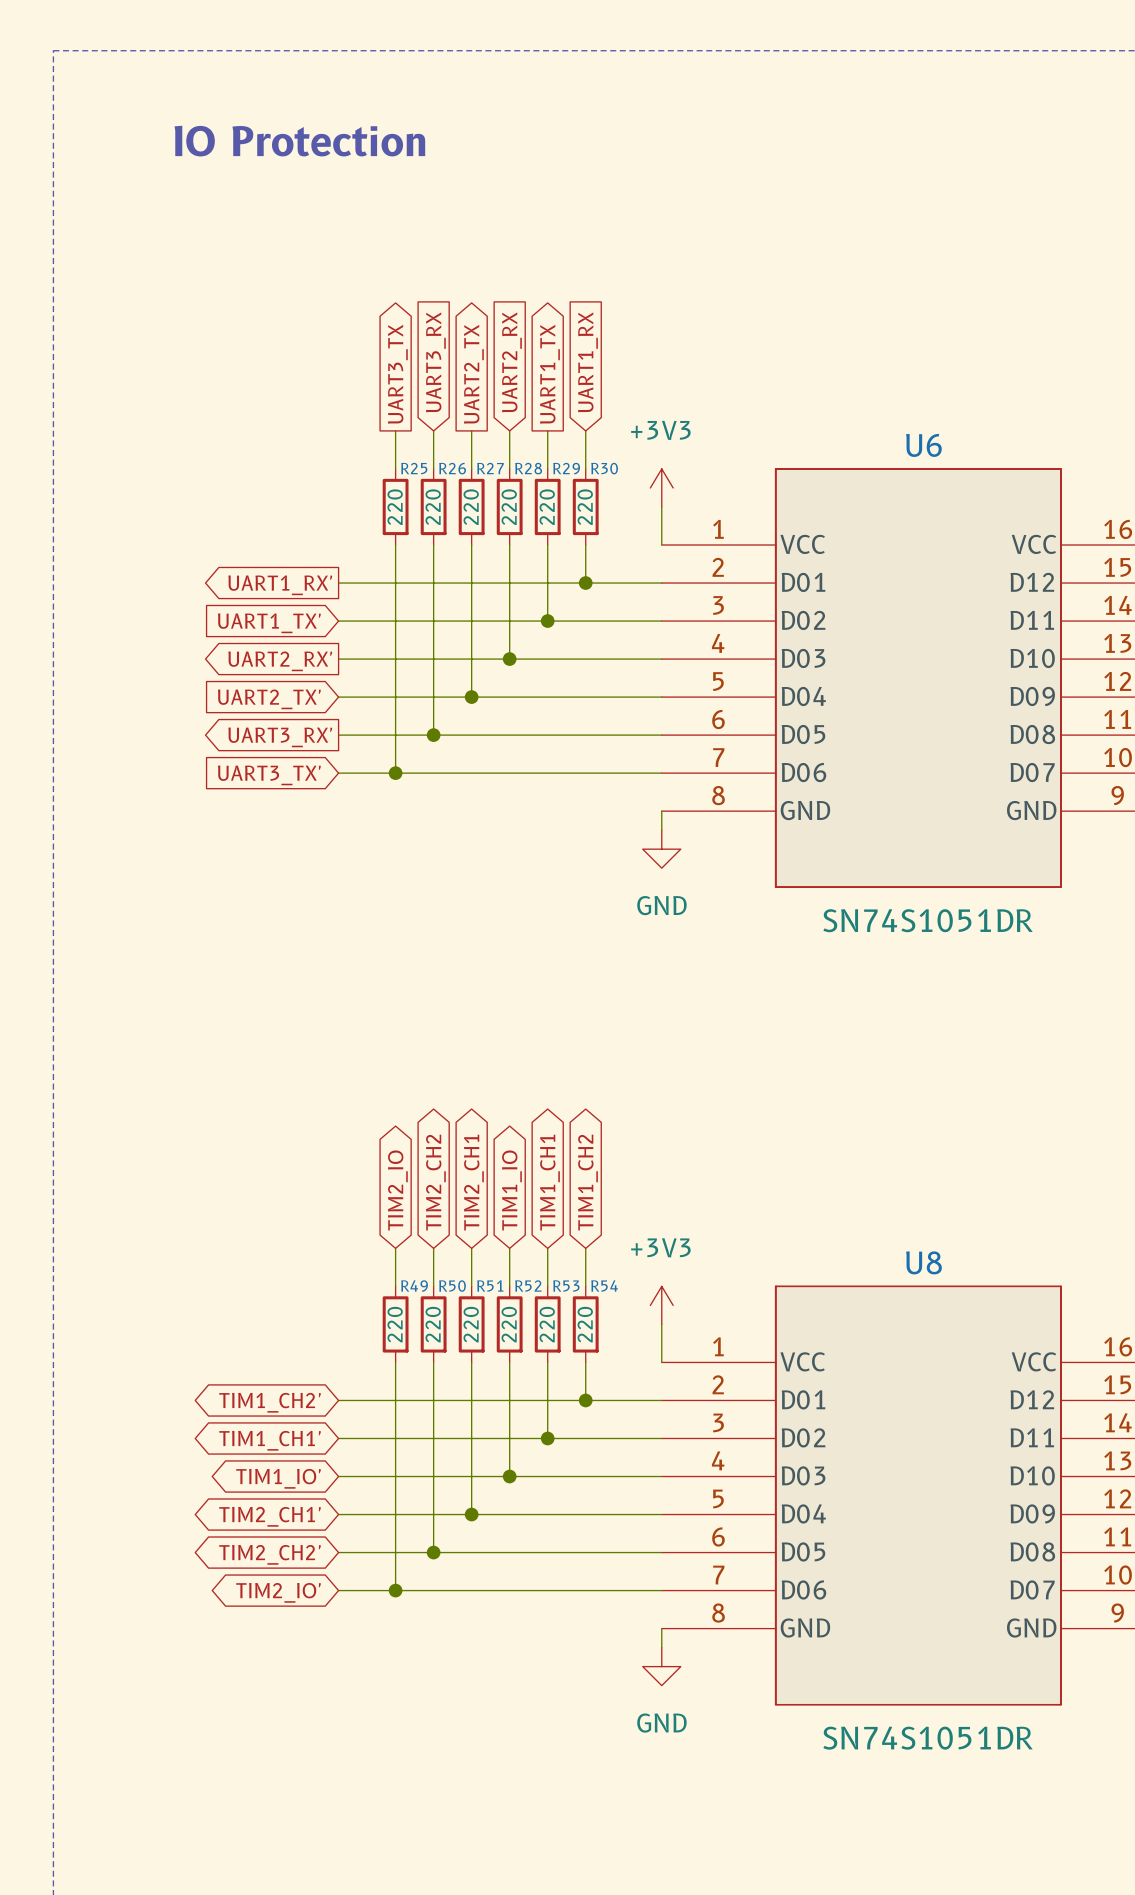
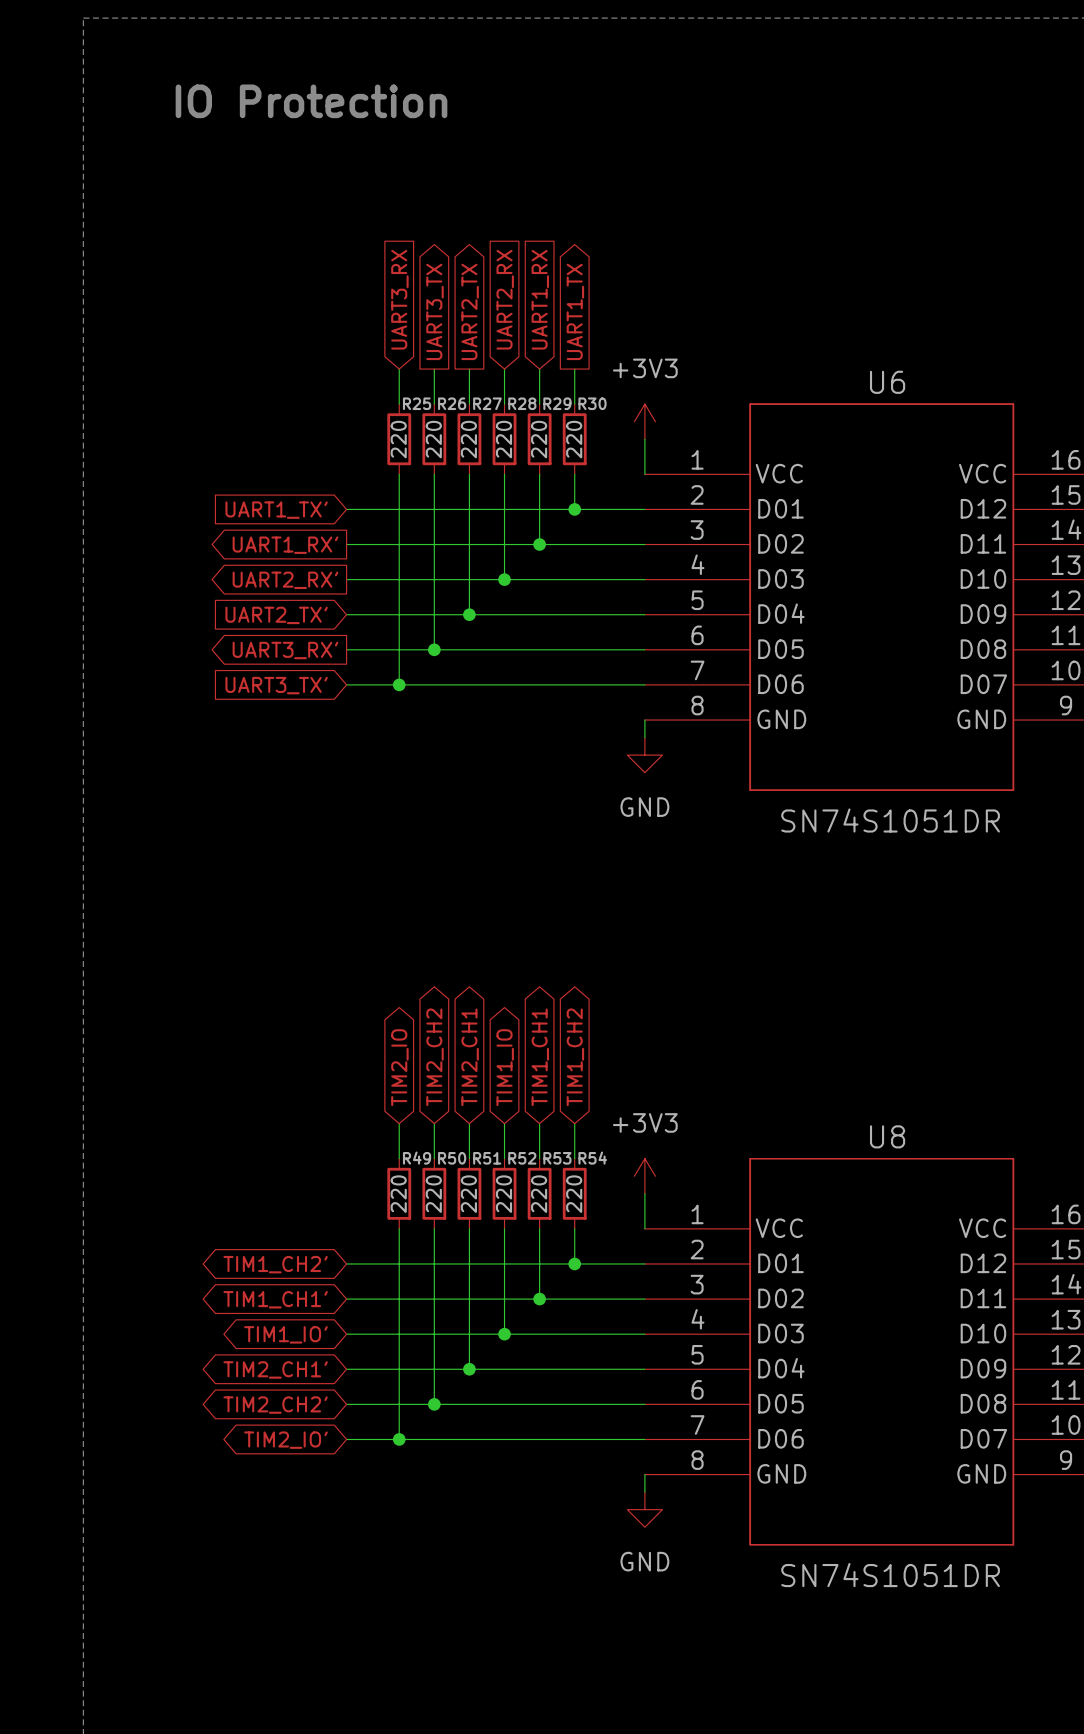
global label shape: input (435, 362) -> output (435, 311)
global label: UART3_RX (435, 362) -> UART3_TX (435, 311)
global label shape: input (587, 362) -> output (575, 311)
global label: UART1_RX (587, 362) -> UART1_TX (575, 311)
global label shape: output (397, 374) -> input (399, 299)
global label: UART3_TX (397, 374) -> UART3_RX (399, 299)
global label shape: output (549, 374) -> input (540, 299)
global label: UART1_TX (549, 374) -> UART1_RX (540, 299)
global label shape: output (280, 585) -> input (276, 510)
global label: UART1_RX' (280, 585) -> UART1_TX' (276, 510)
global label shape: input (269, 623) -> output (285, 545)
global label: UART1_TX' (269, 623) -> UART1_RX' (285, 545)

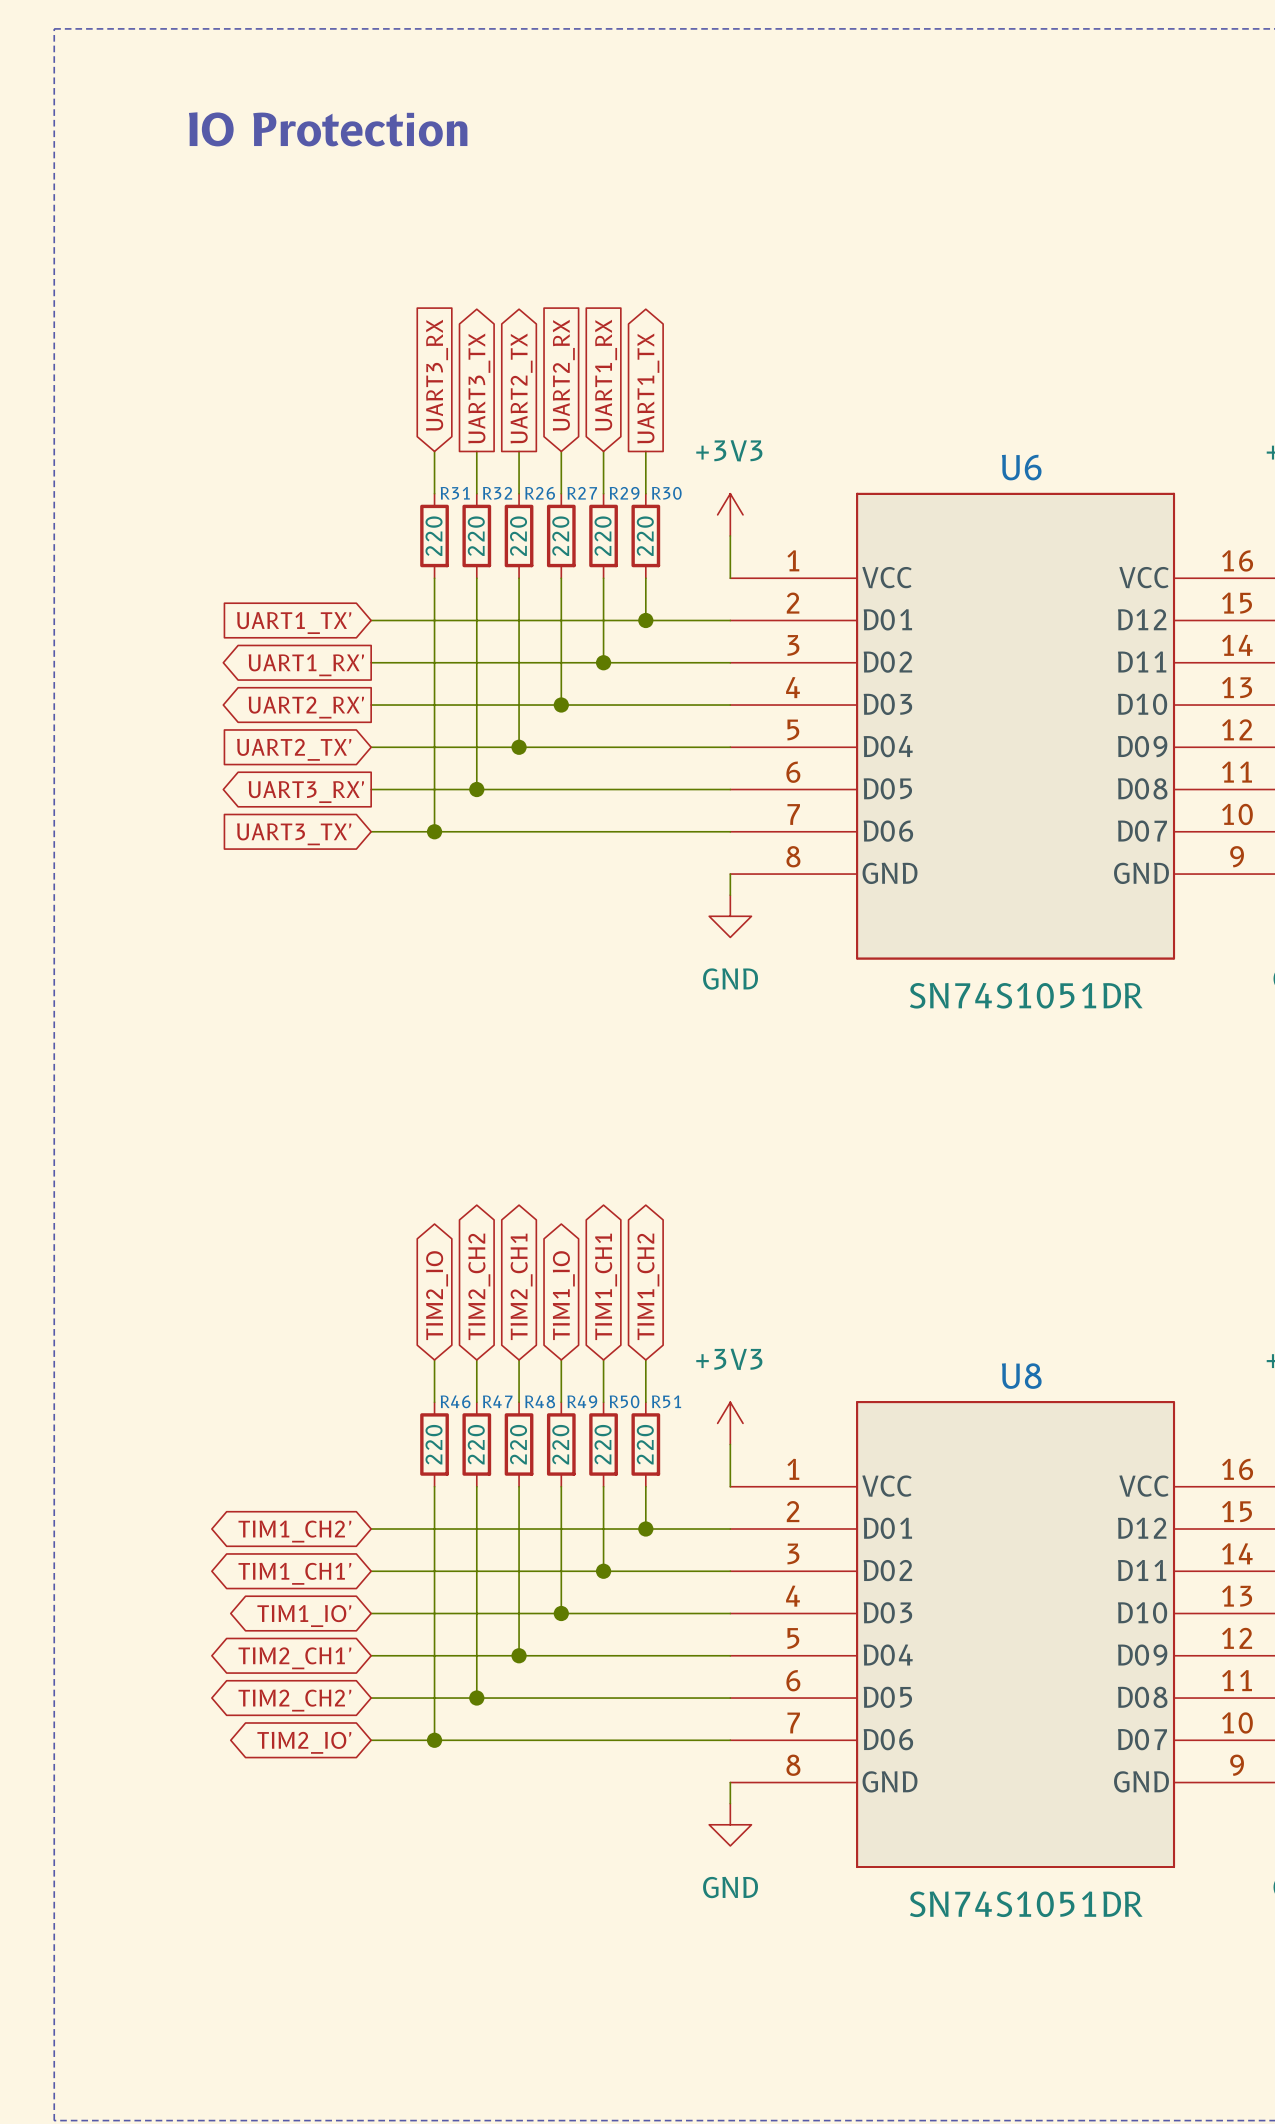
R25 name: R25 (417, 403) -> R31 (455, 493)
R26 name: R26 (452, 403) -> R32 (497, 493)
R27 name: R27 (487, 403) -> R26 (540, 493)
R28 name: R28 (522, 403) -> R27 (582, 493)
R49 name: R49 (417, 1158) -> R46 (455, 1401)
R50 name: R50 (452, 1158) -> R47 (497, 1401)
R51 name: R51 (487, 1158) -> R48 (540, 1401)
R52 name: R52 (522, 1158) -> R49 (582, 1401)
R53 name: R53 (557, 1158) -> R50 (624, 1401)
R54 name: R54 (592, 1158) -> R51 (666, 1401)

